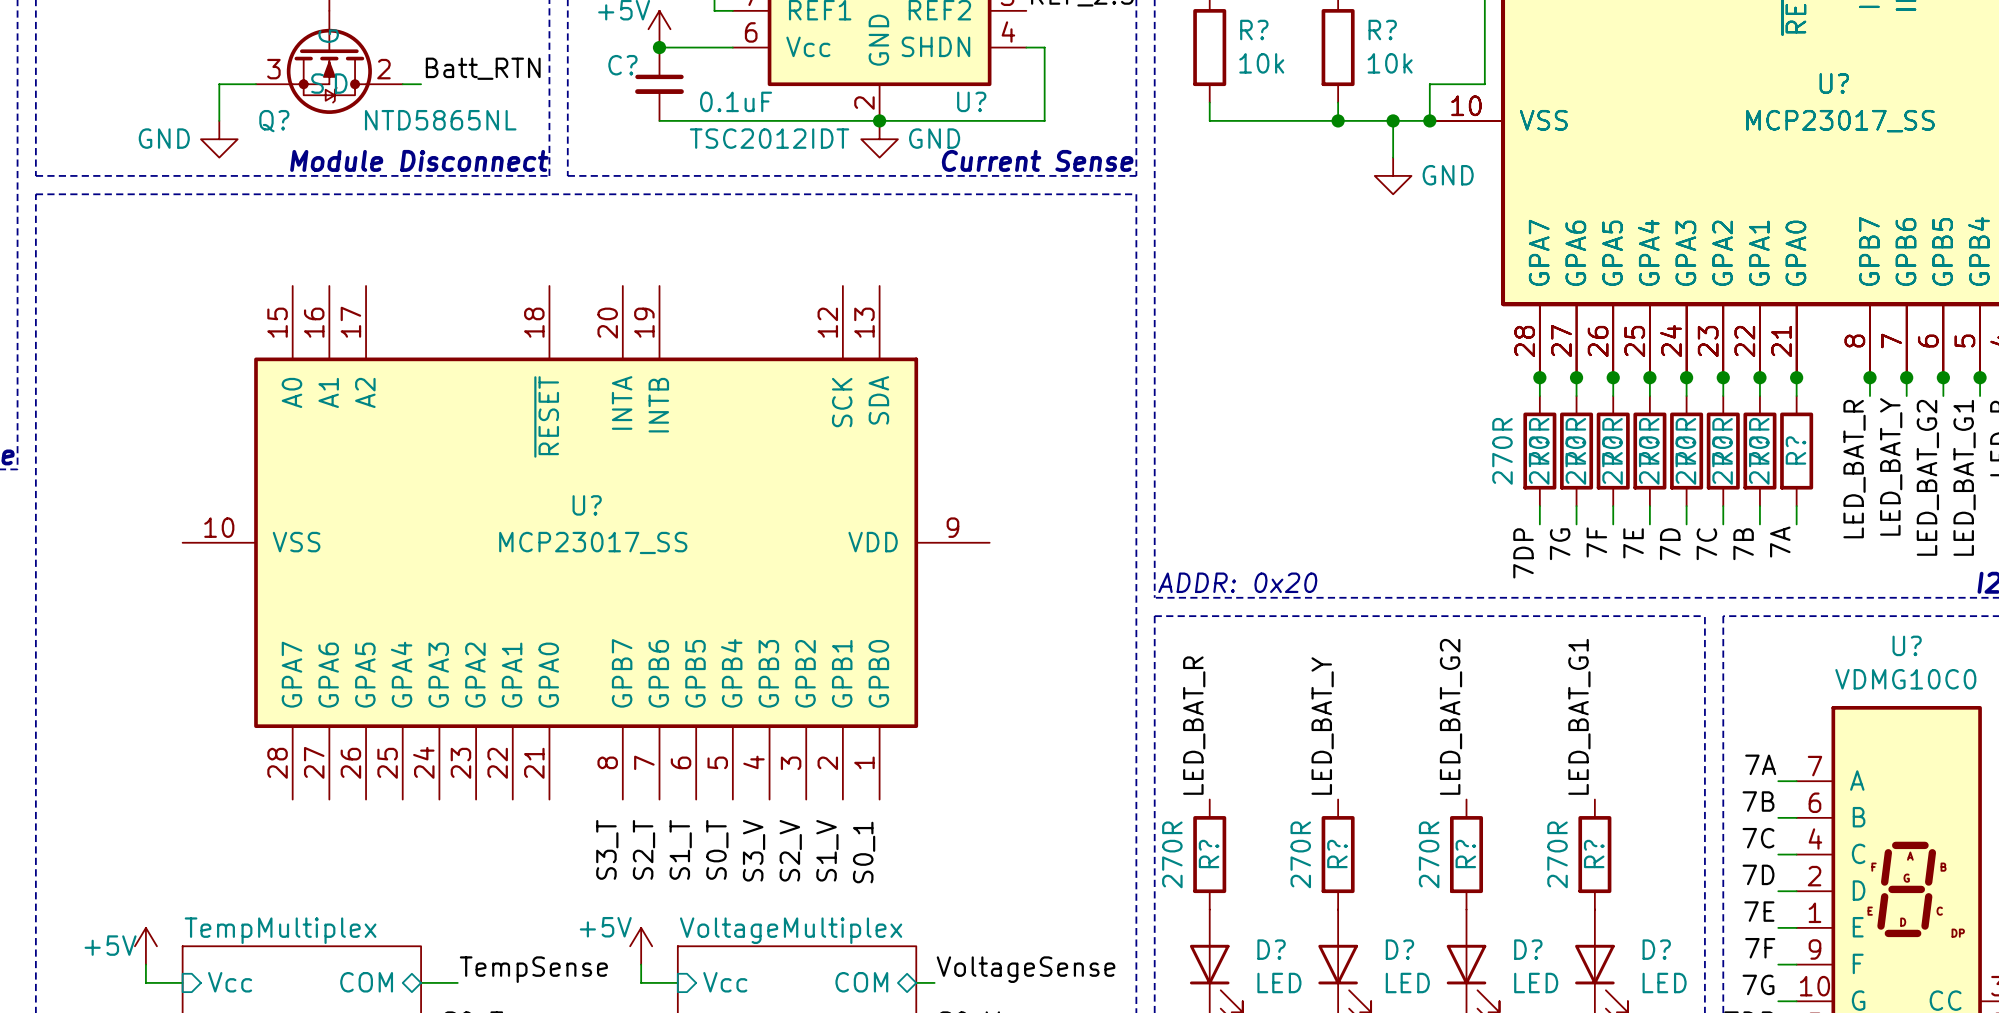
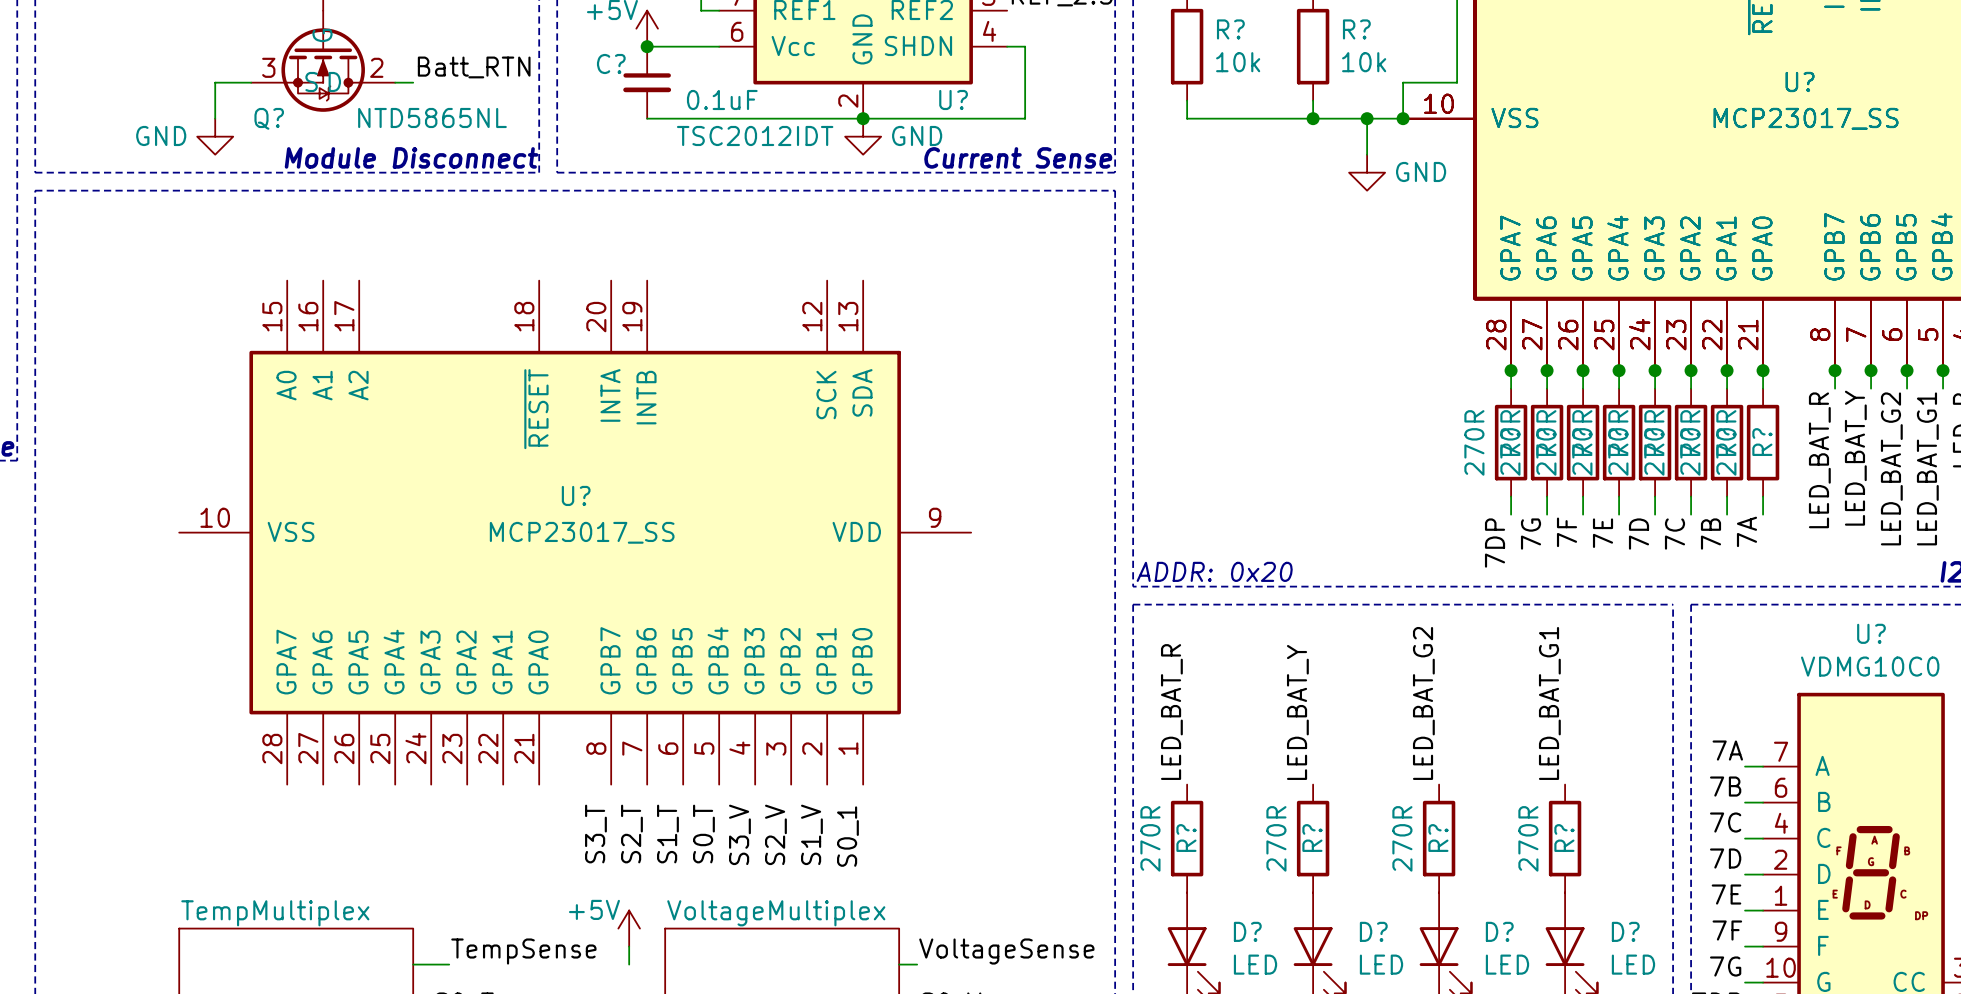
power symbol: +5V (145, 946) -> none
wire: (145, 964) (145, 982) (182, 982) -> none
sheet pin: Vcc (230, 982) -> none
sheet pin: COM (366, 982) -> none
wire: (641, 982) (677, 982) -> none
sheet pin: Vcc (725, 982) -> none
sheet pin: COM (861, 982) -> none

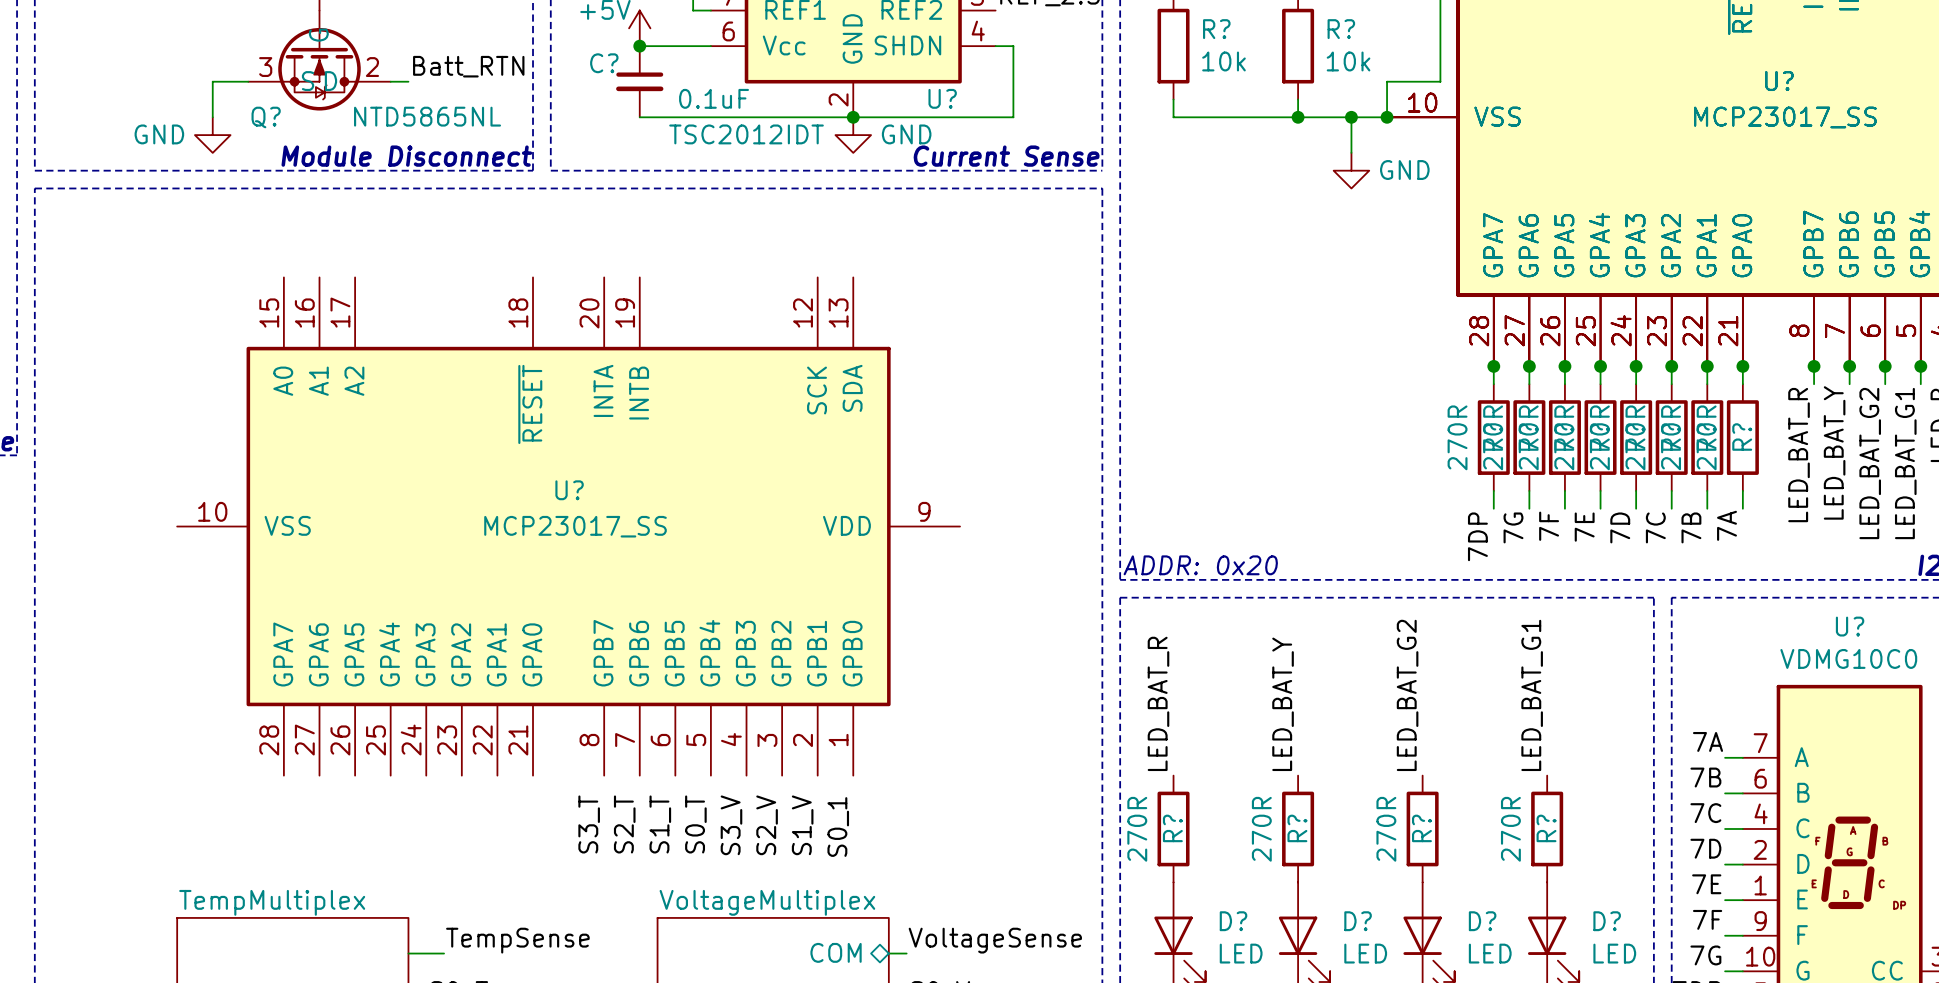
power symbol: +5V (629, 928) -> none
wire: (629, 946) (629, 964) -> none
sheet pin: none -> COM (836, 952)

